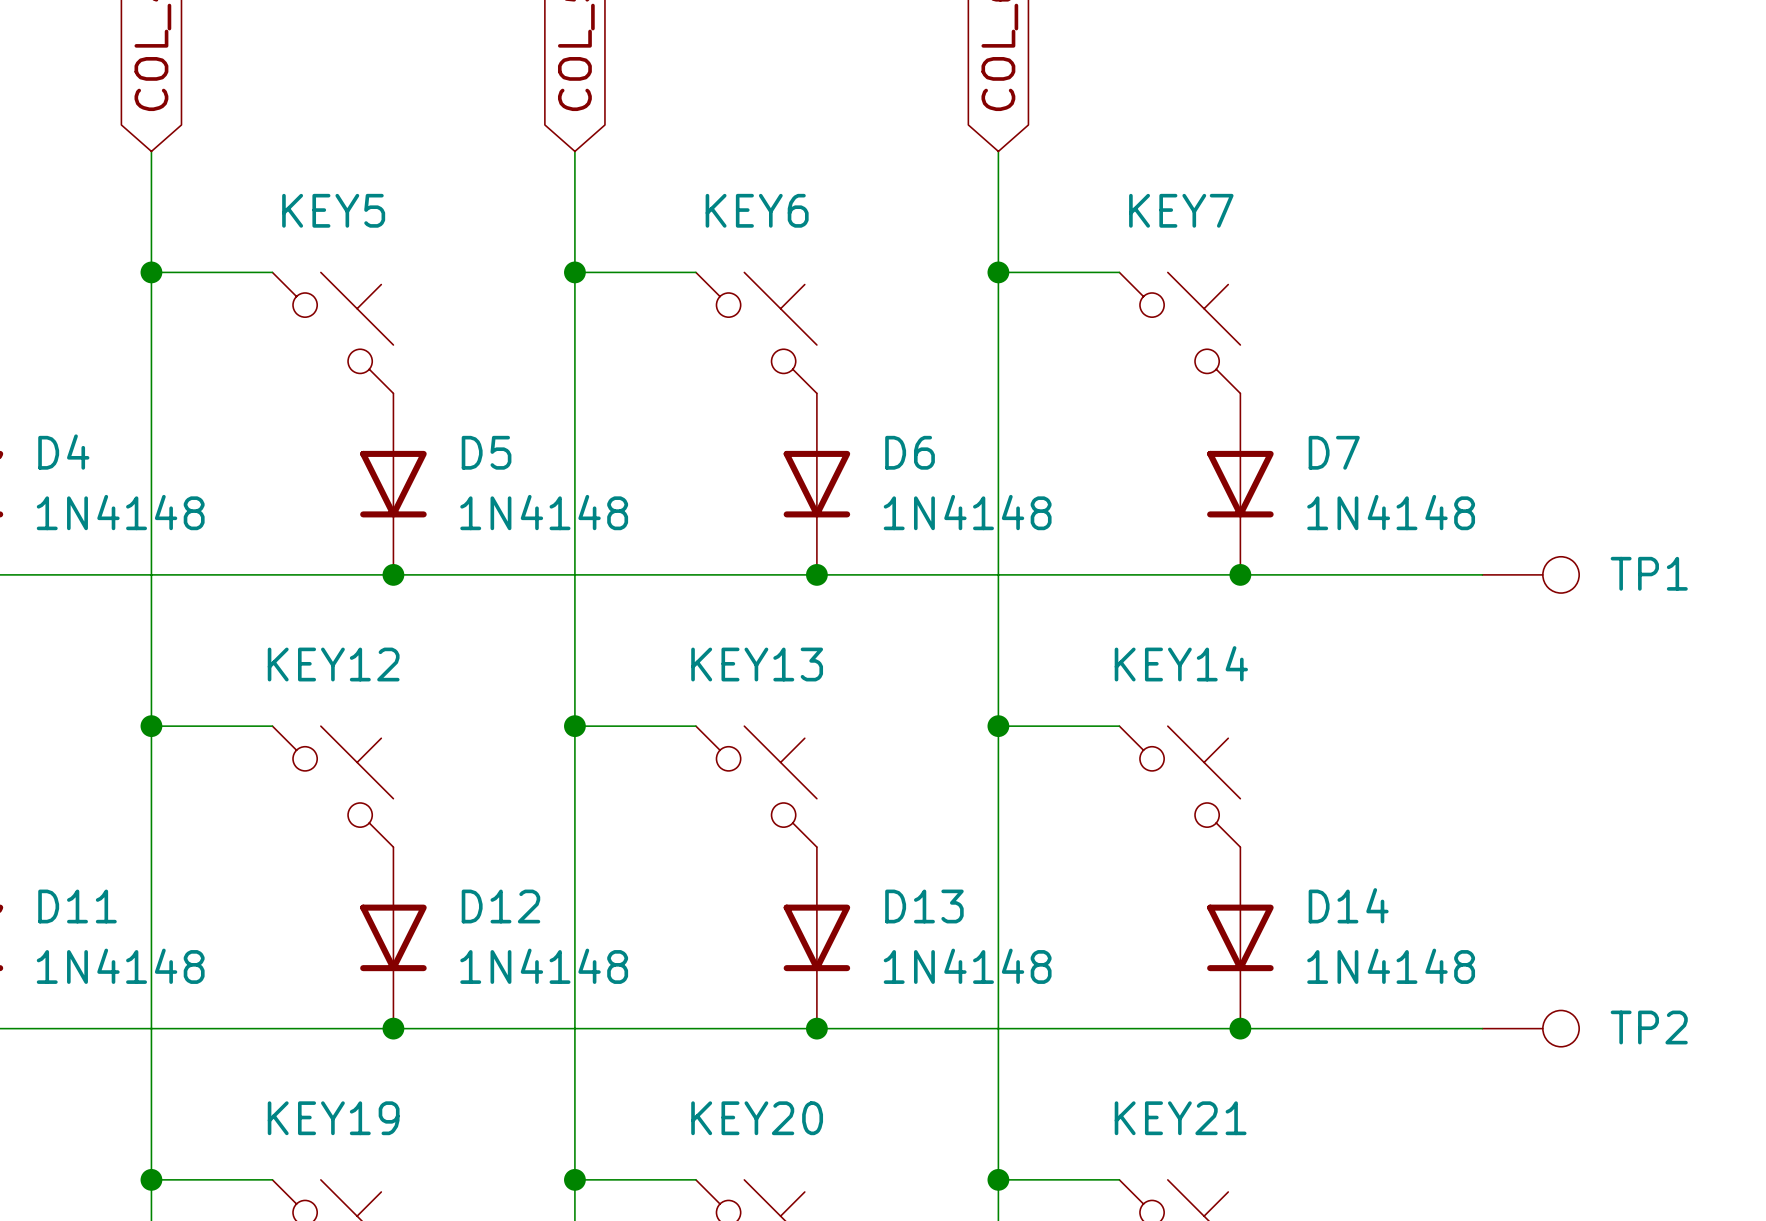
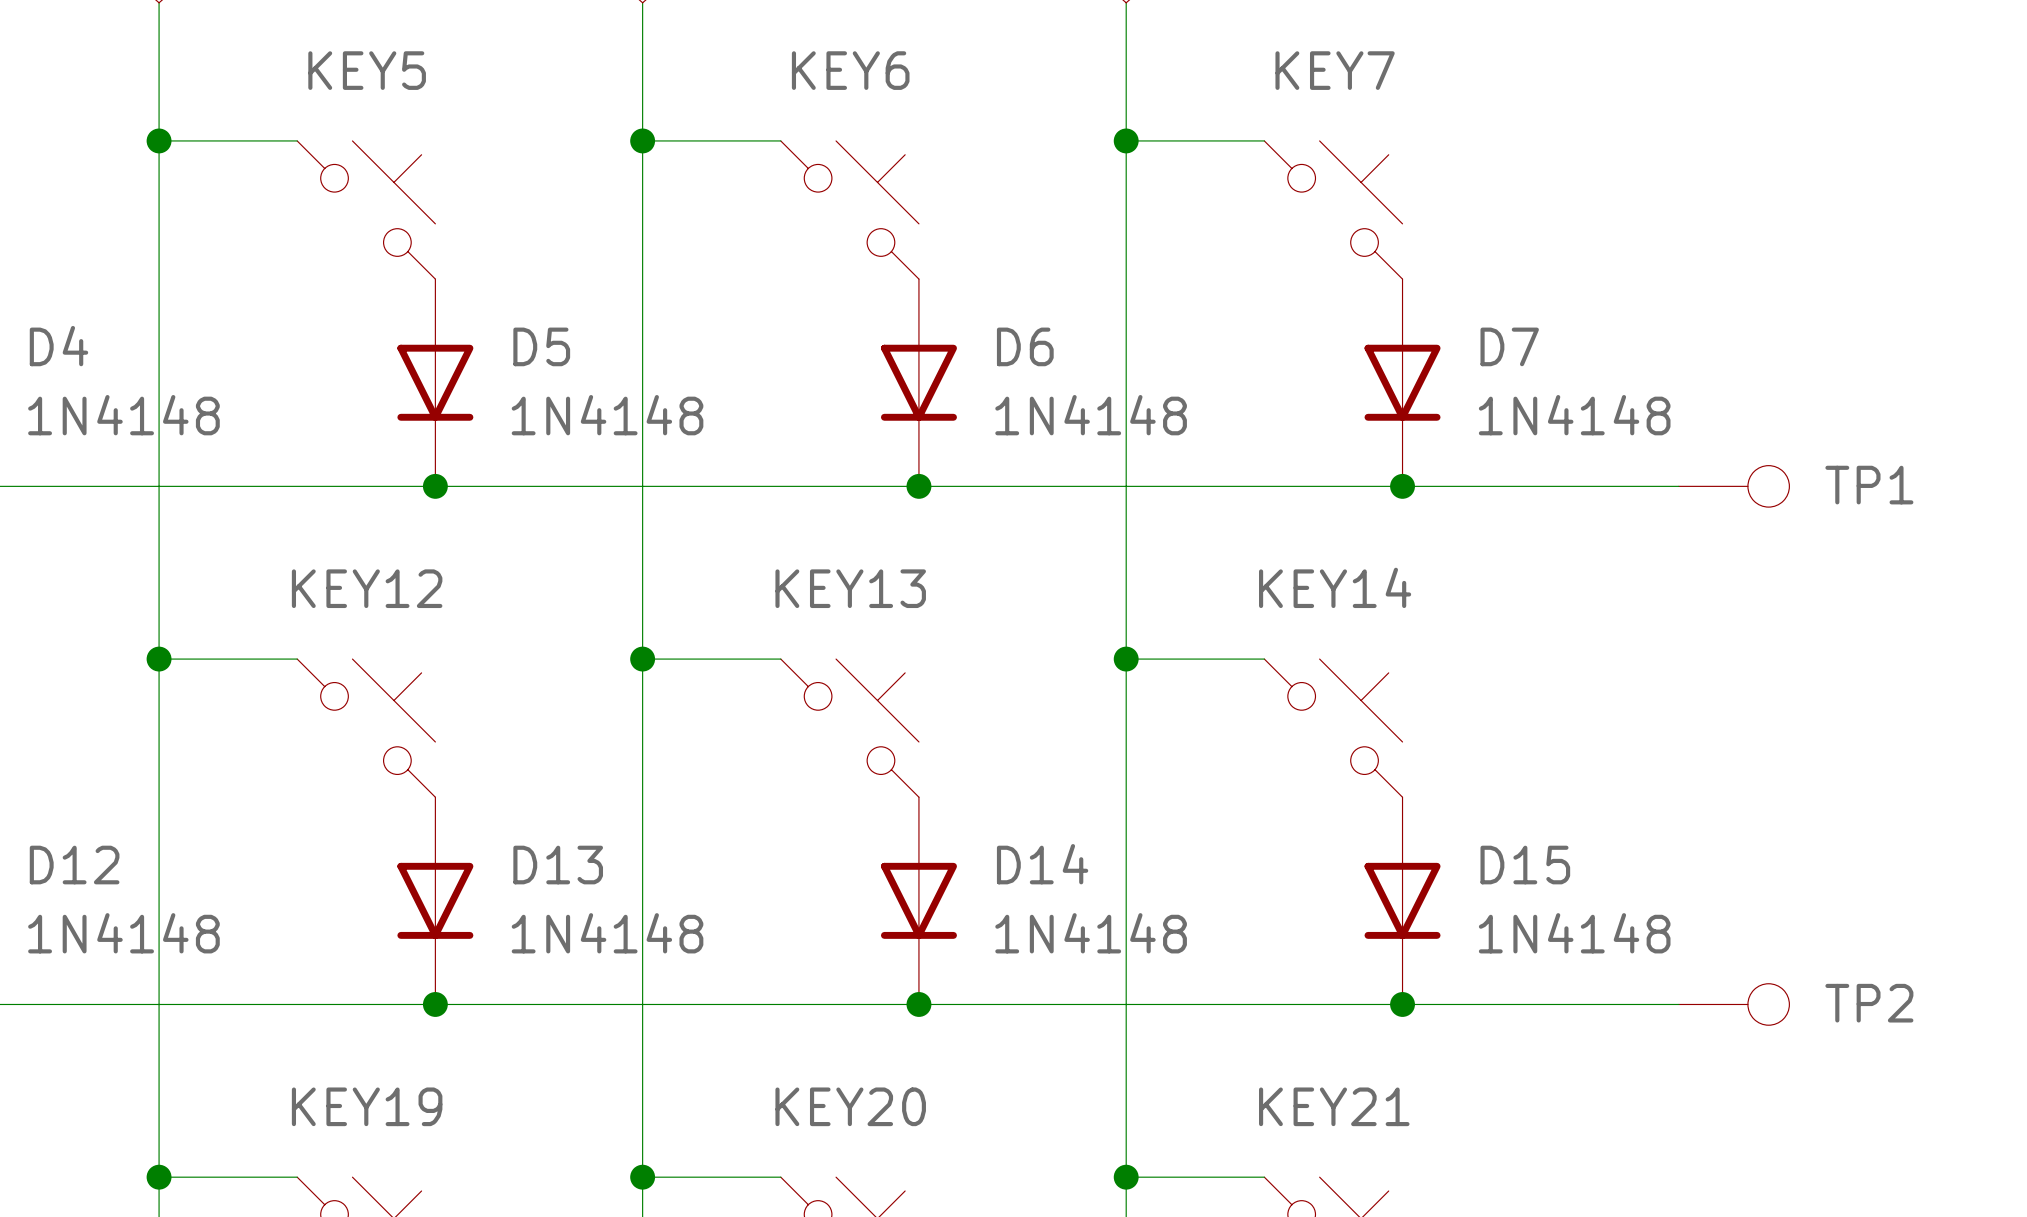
D14 name: D14 (1348, 905) -> D15 (1525, 865)
D11 name: D11 (77, 906) -> D12 (74, 865)
D12 name: D12 (500, 906) -> D13 (558, 865)
D13 name: D13 (924, 906) -> D14 (1042, 864)

